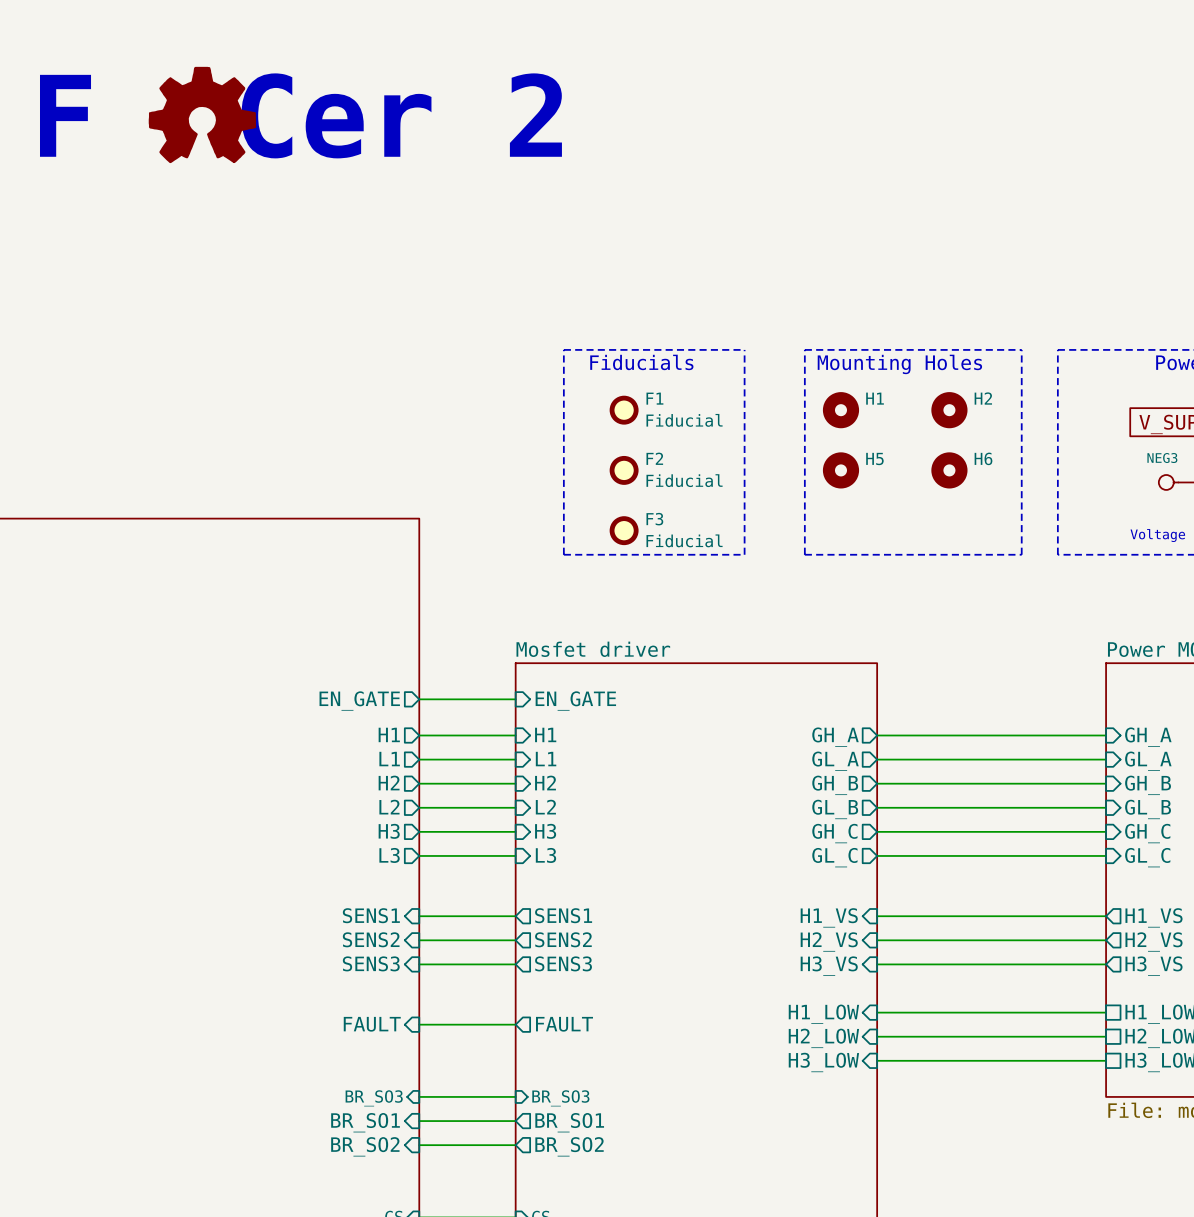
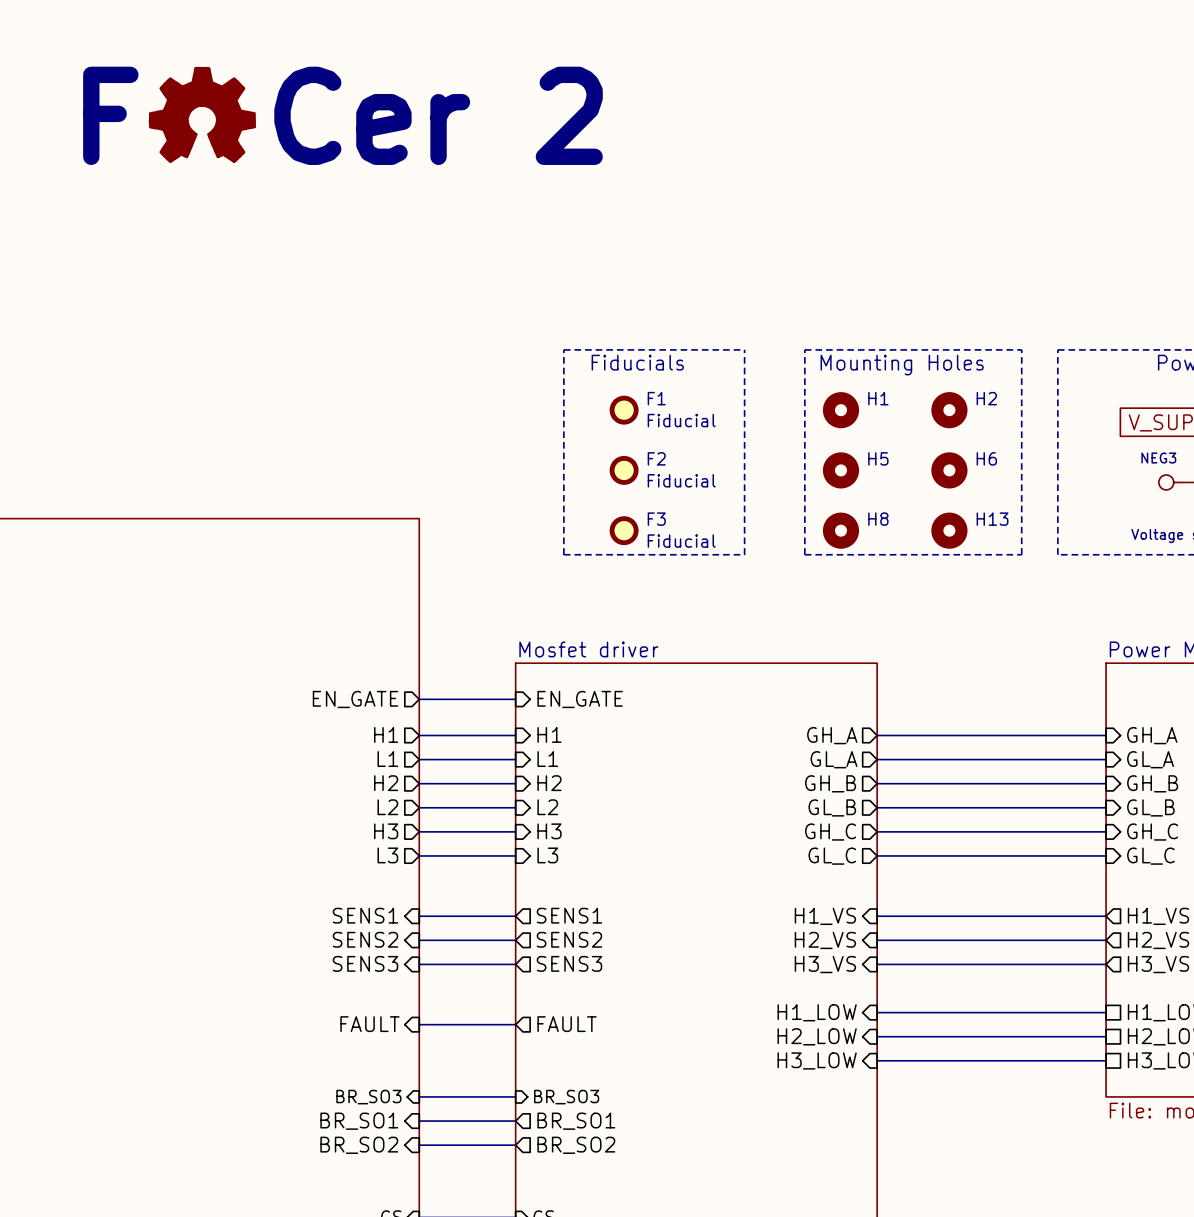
H8: none -> (840, 530)
H13: none -> (949, 530)

